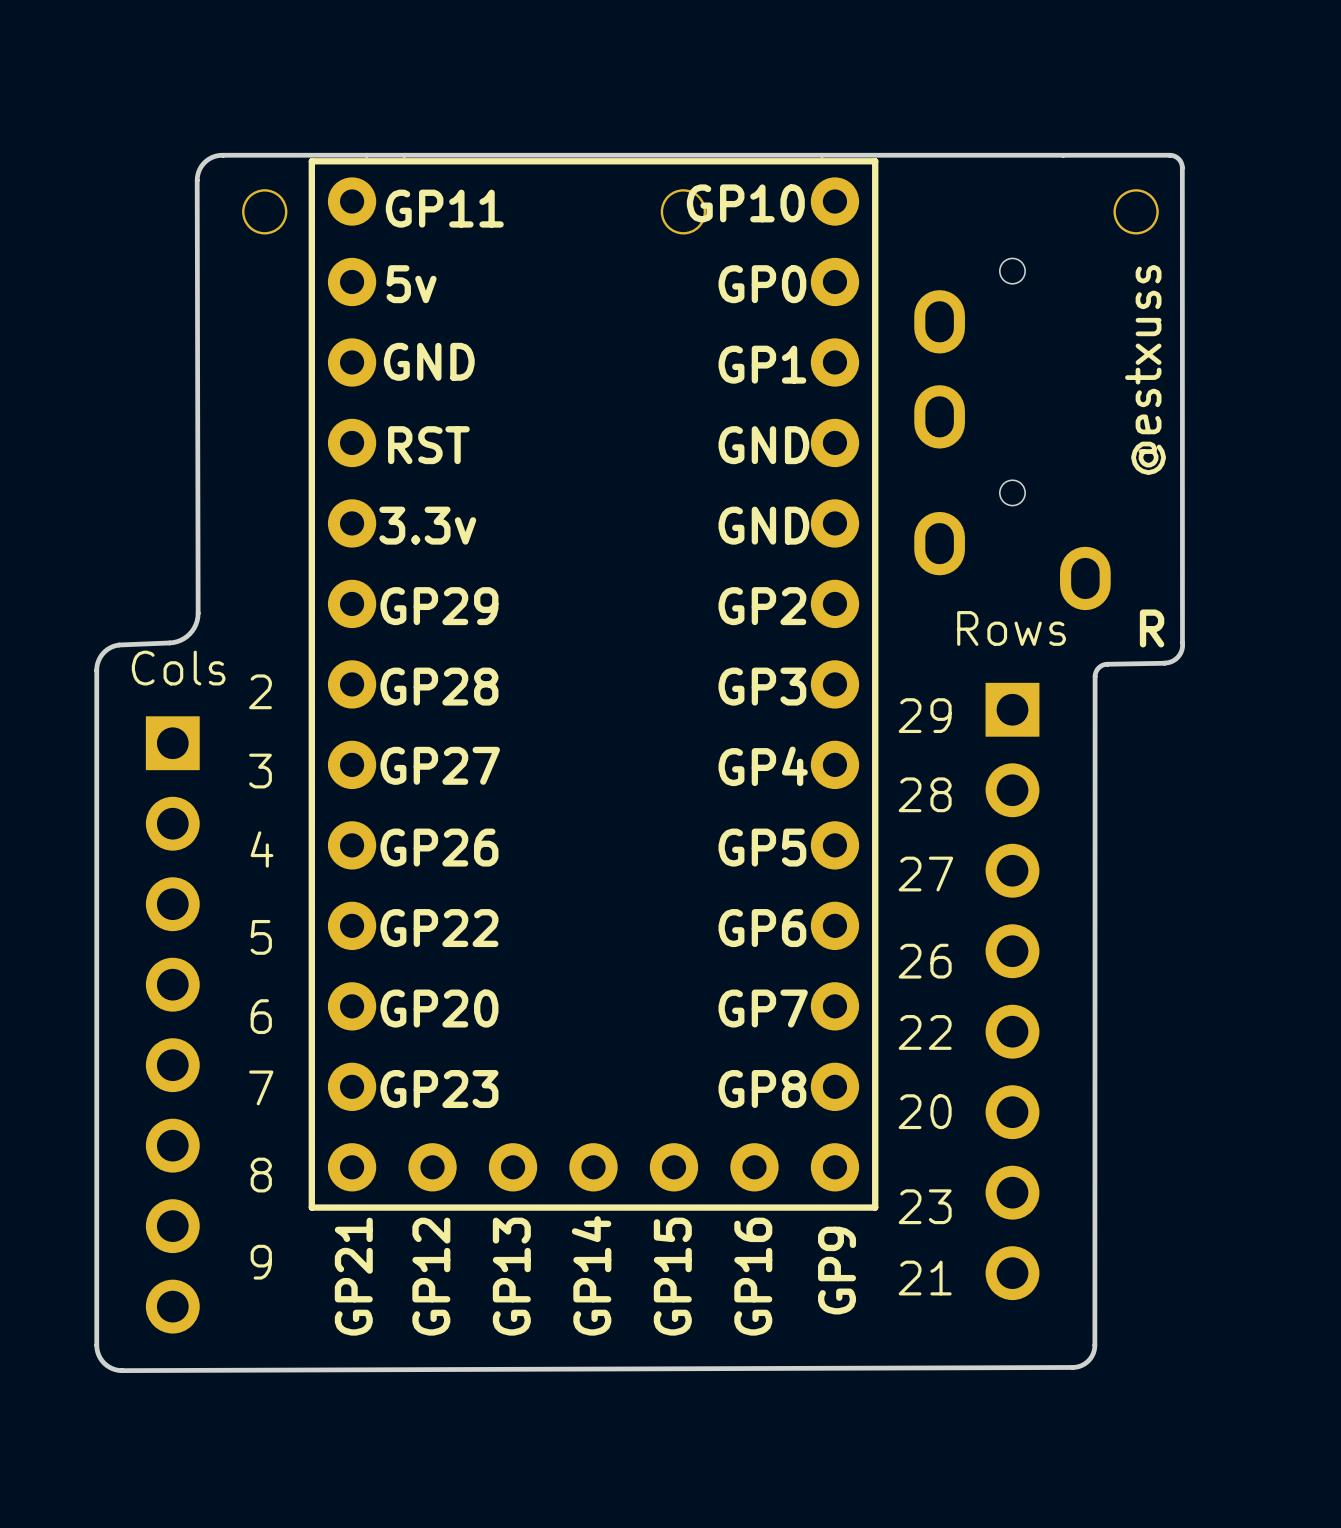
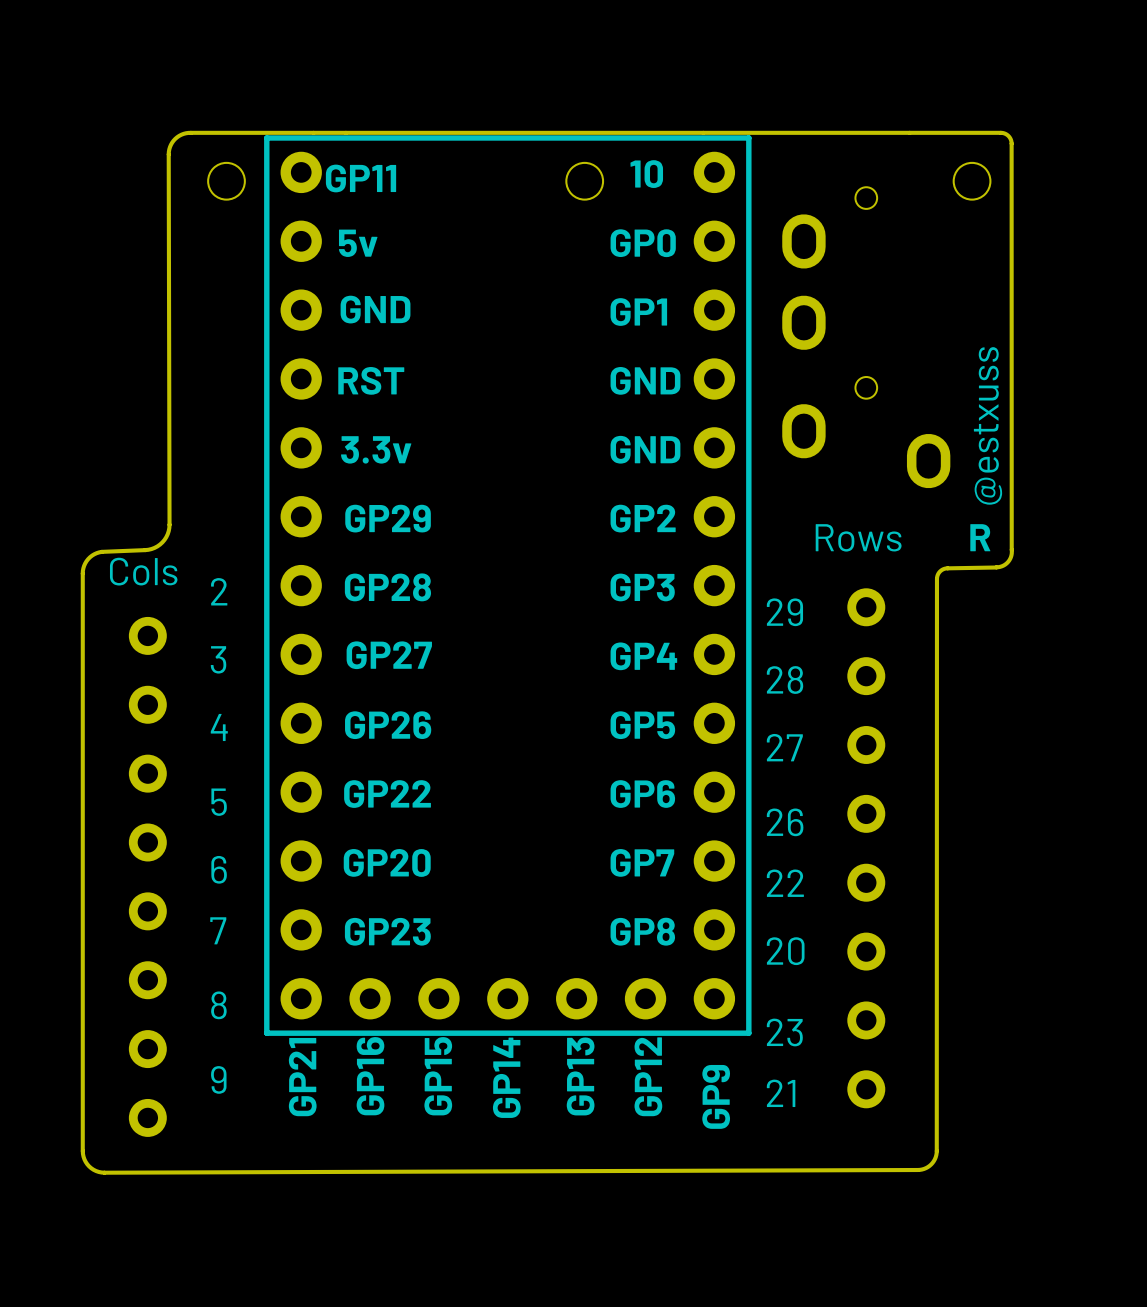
part text: GP10 (745, 203) -> none
part text: none -> 10 (646, 174)
text position: @estxuss (1145, 370) -> @estxuss (988, 425)
part position: (1012, 434) -> (866, 337)
part footprint: [985, 682, 1040, 1301] -> [847, 588, 886, 1109]
part footprint: [145, 716, 200, 1334] -> [128, 616, 167, 1137]
part text position: GP12 (431, 1276) -> GP12 (648, 1076)
part text: GP13 (511, 1276) -> GP15 (438, 1076)
part text: GP15 (672, 1276) -> none
part text: none -> GP13 (580, 1076)
part text position: GP16 (753, 1276) -> GP16 (370, 1076)

